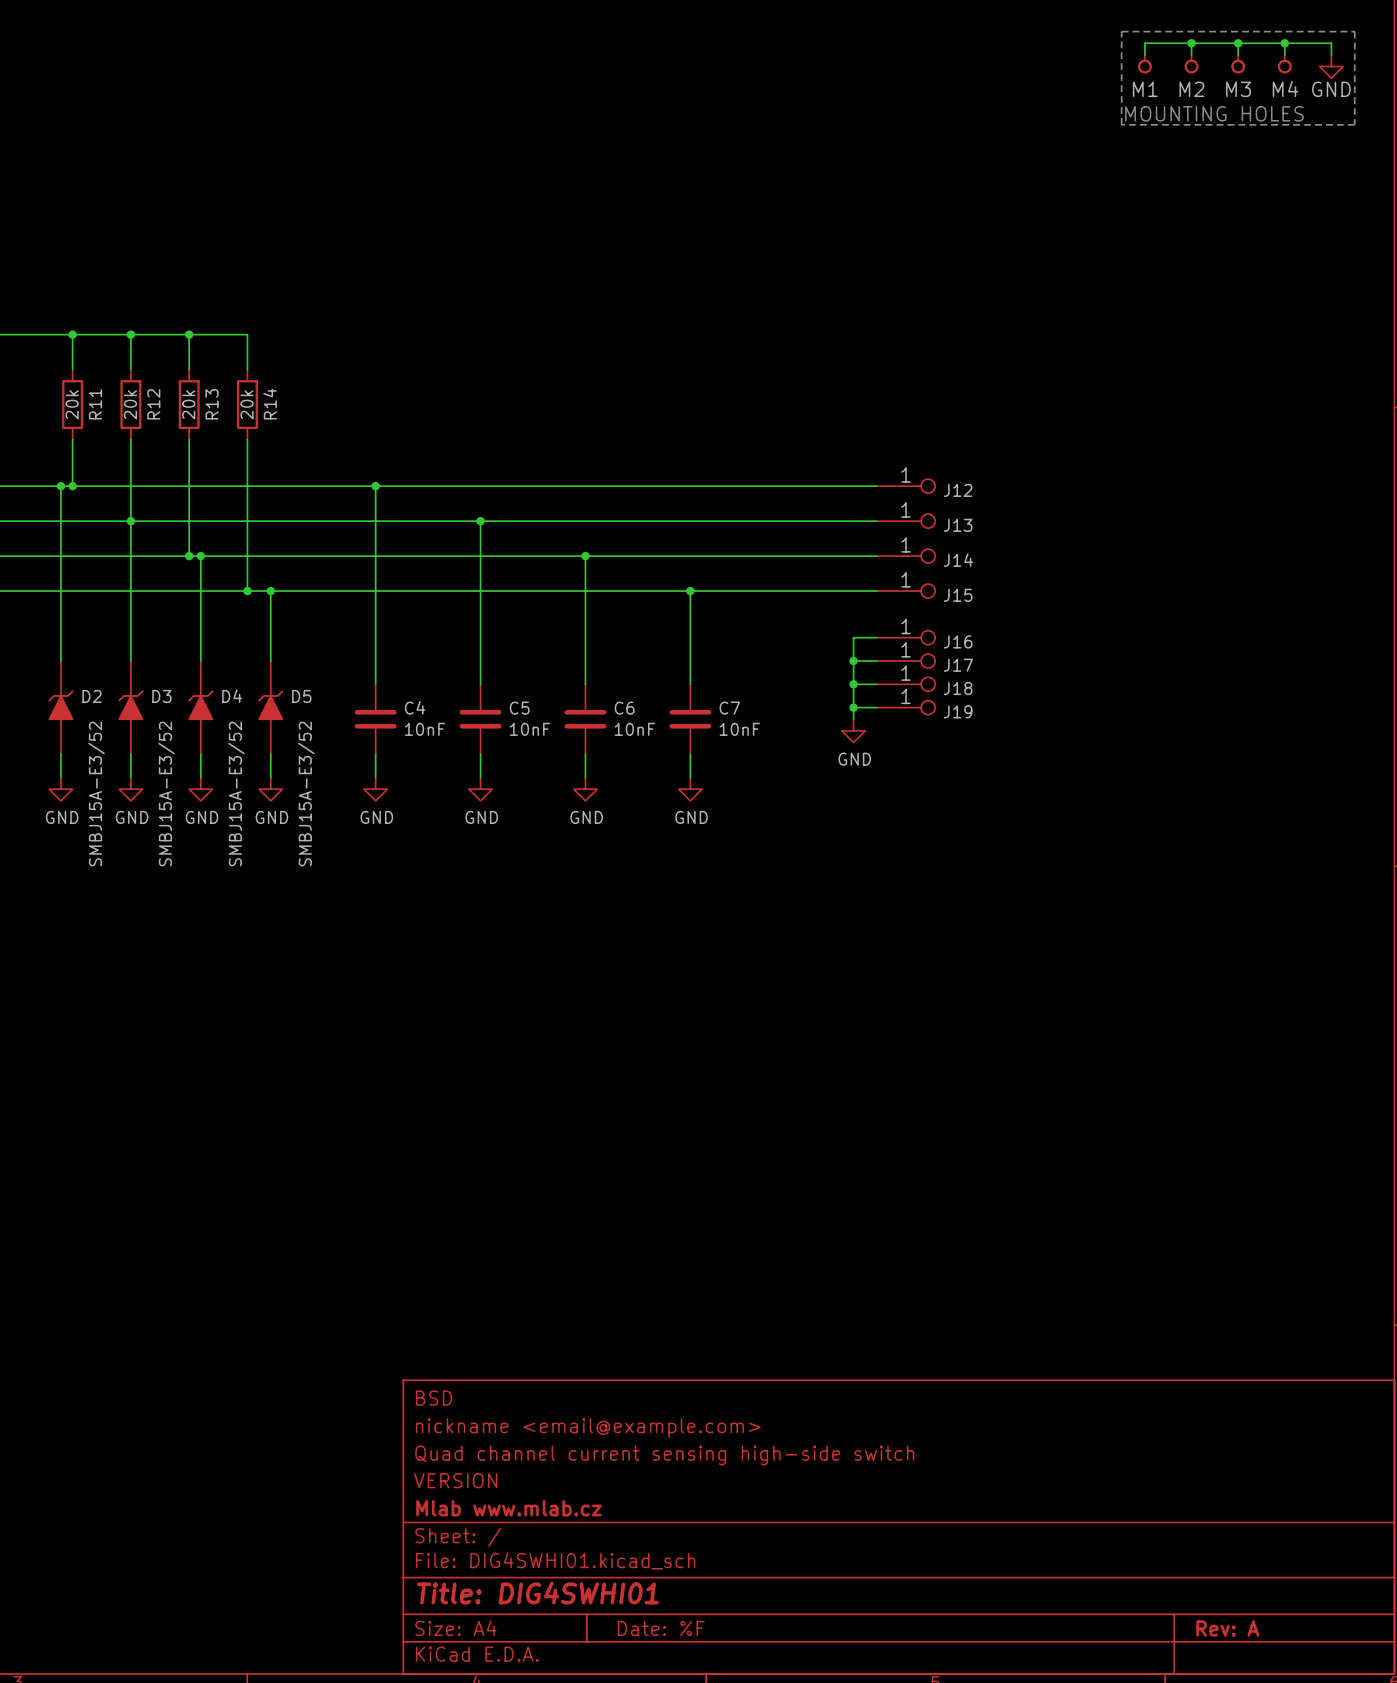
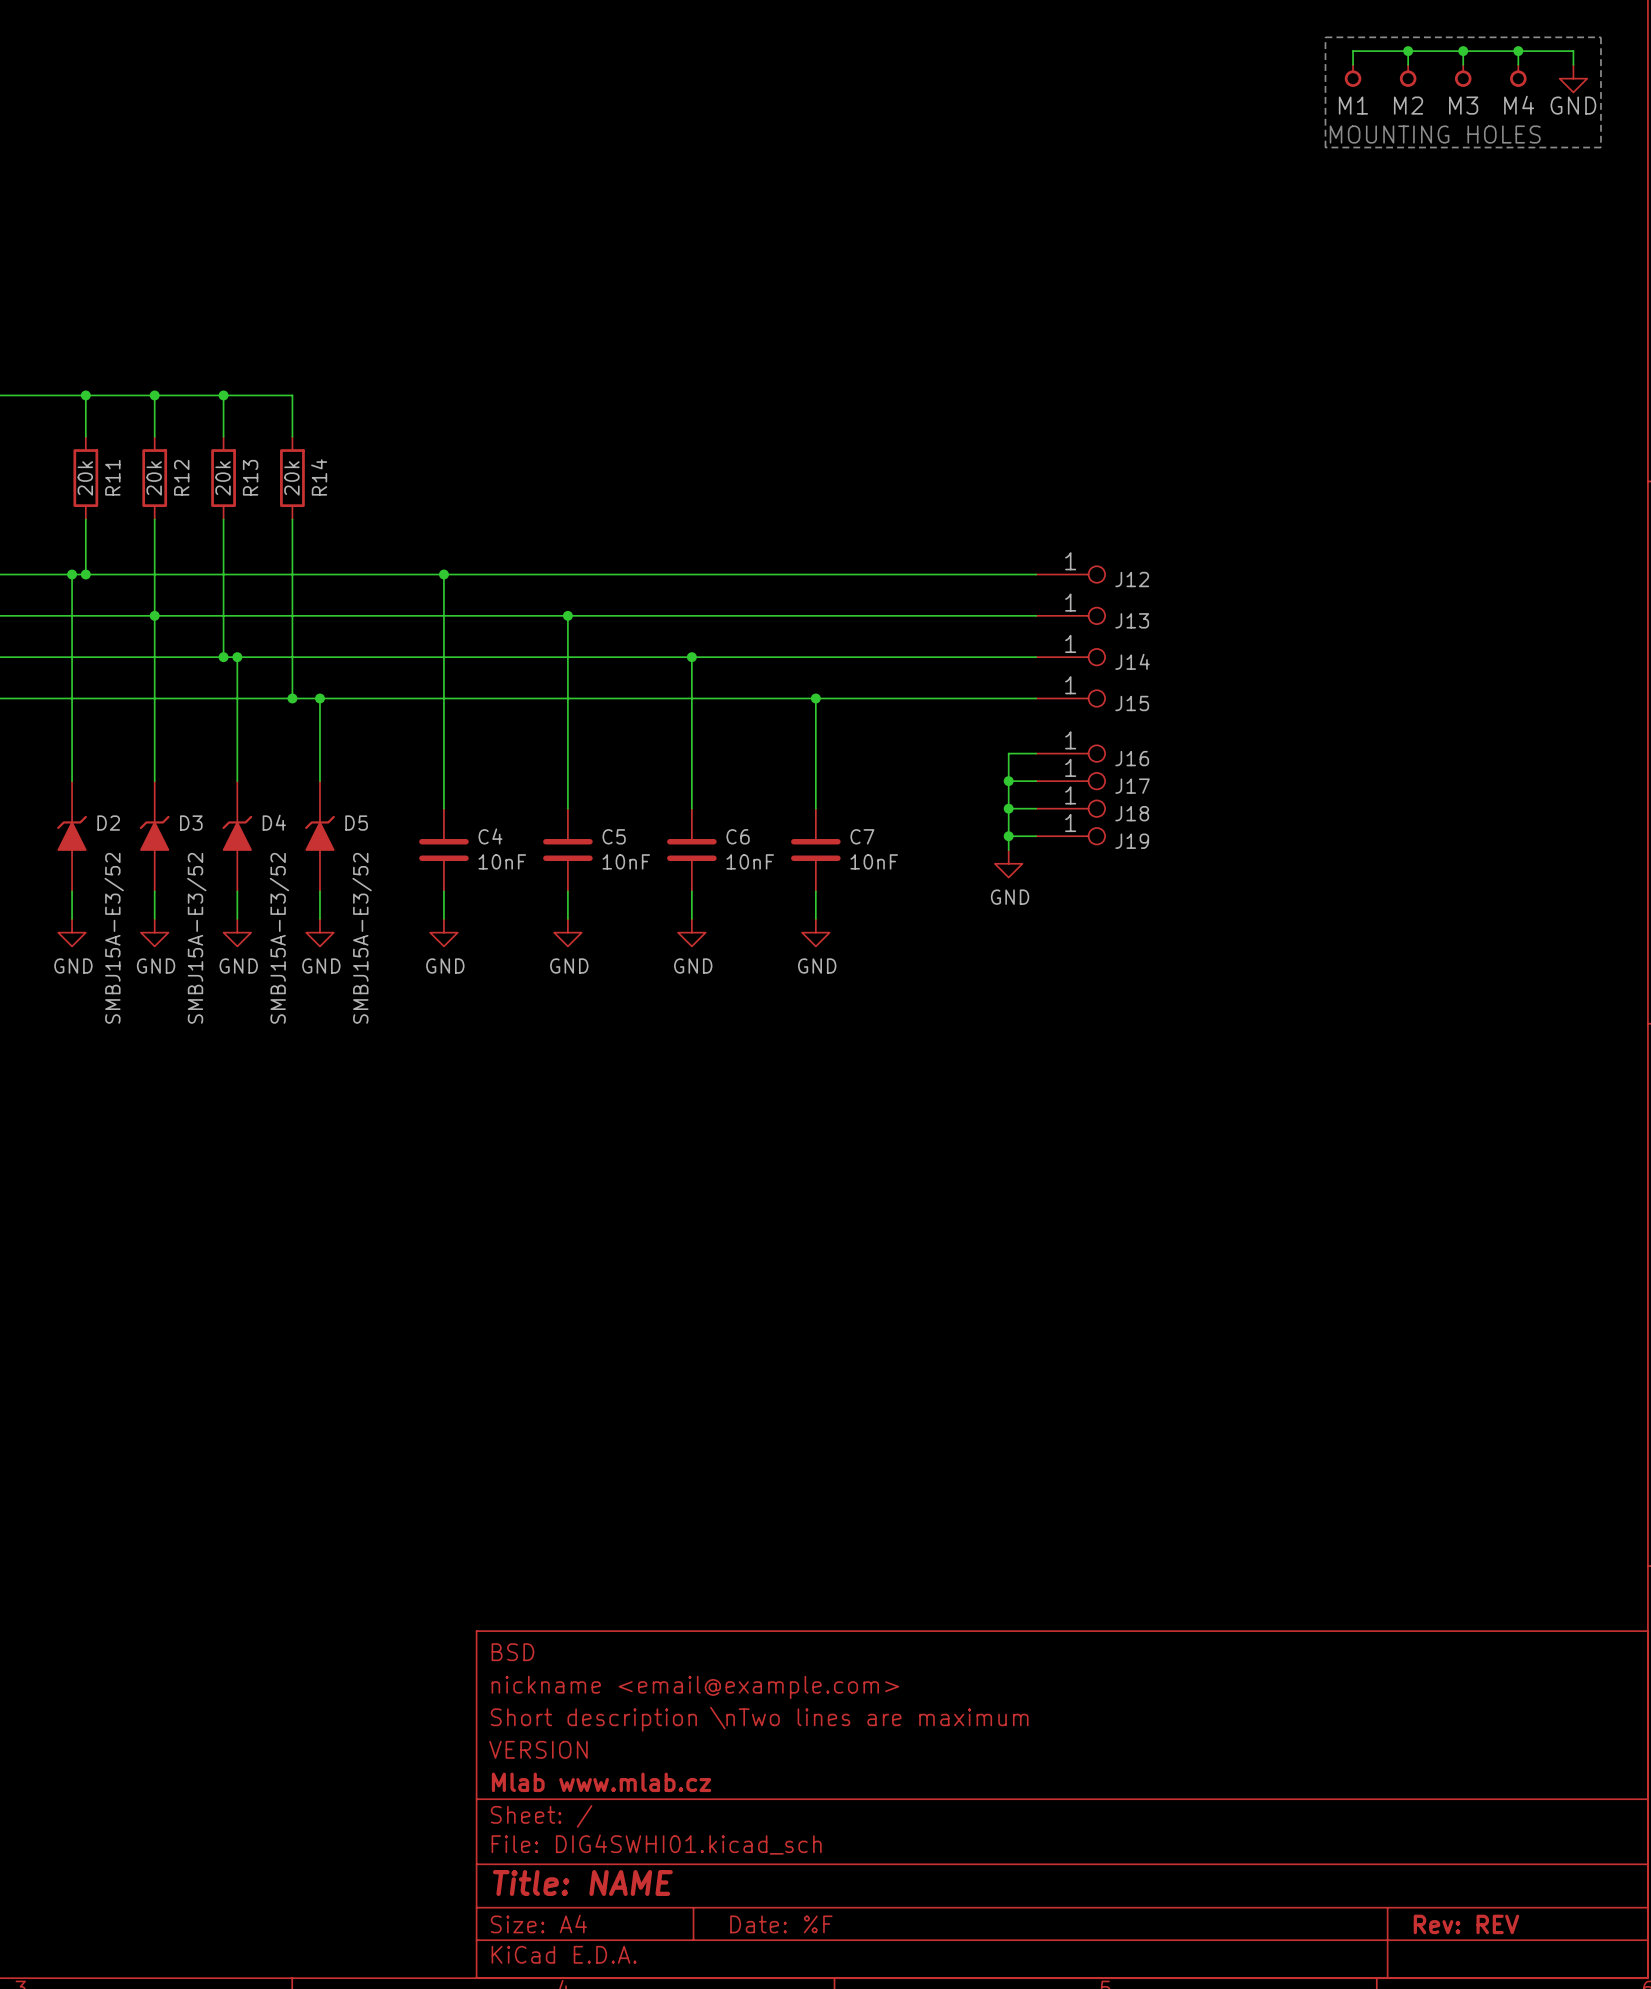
title block: Quad channel current sensing high-side switch (664, 1455) -> Short description \nTwo lines are maximum (759, 1719)
title block: Title: DIG4SWHI01 (537, 1592) -> Title: NAME (582, 1883)
title block: Rev: A (1227, 1628) -> Rev: REV (1466, 1924)

